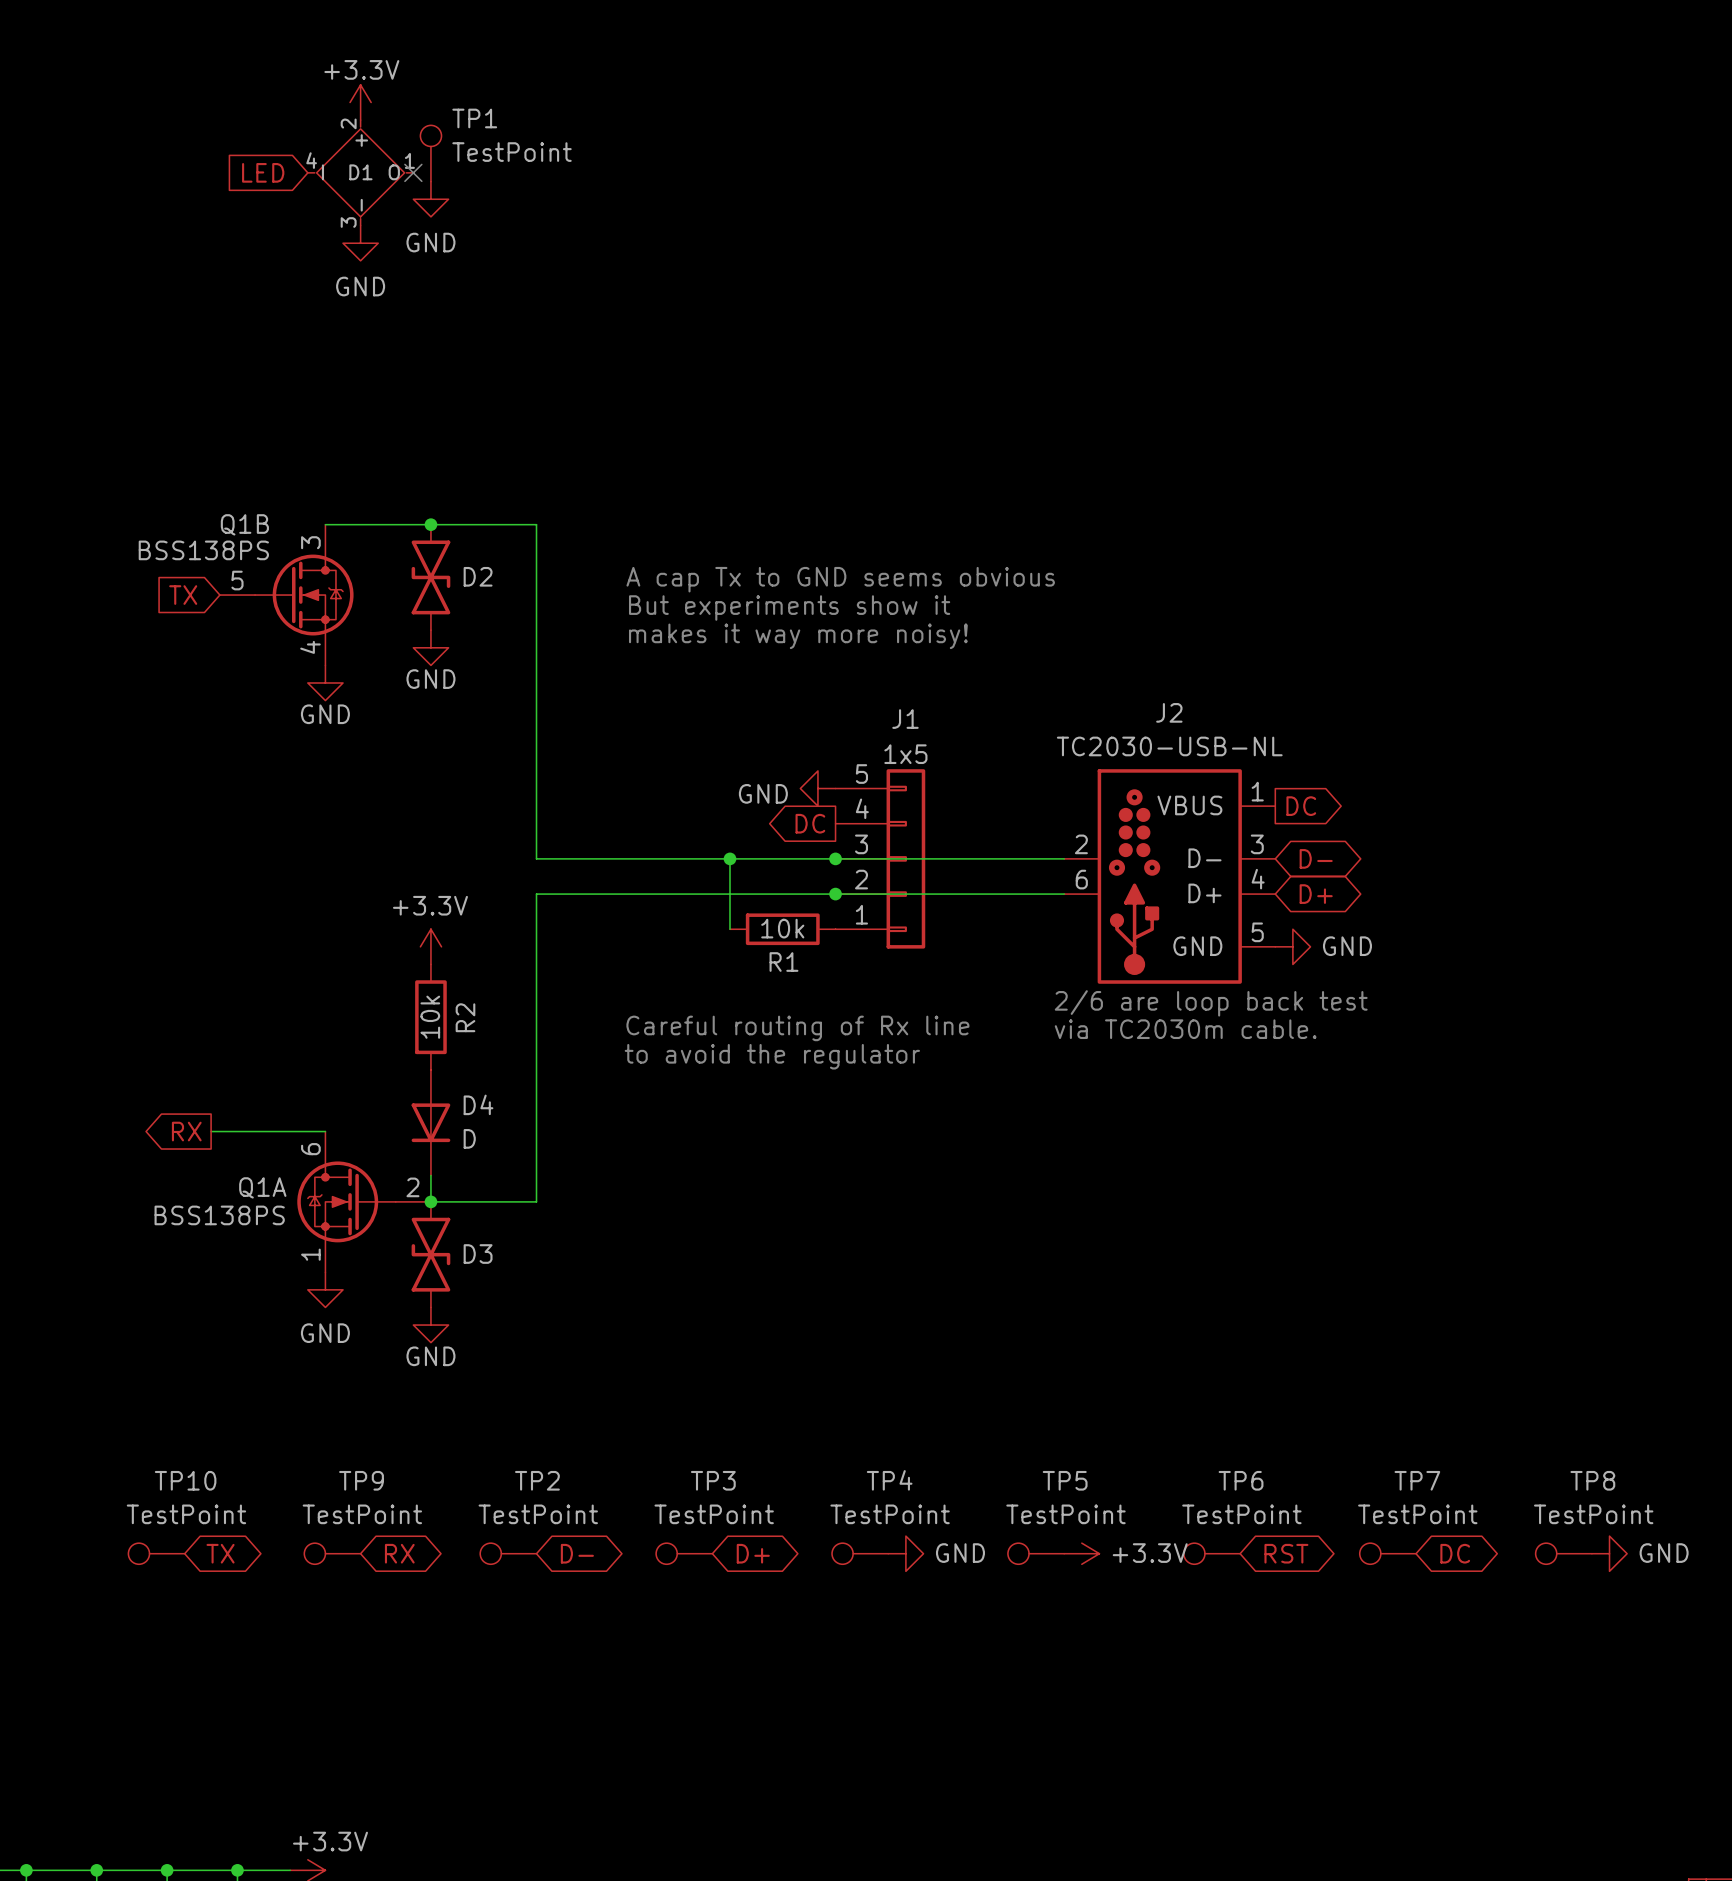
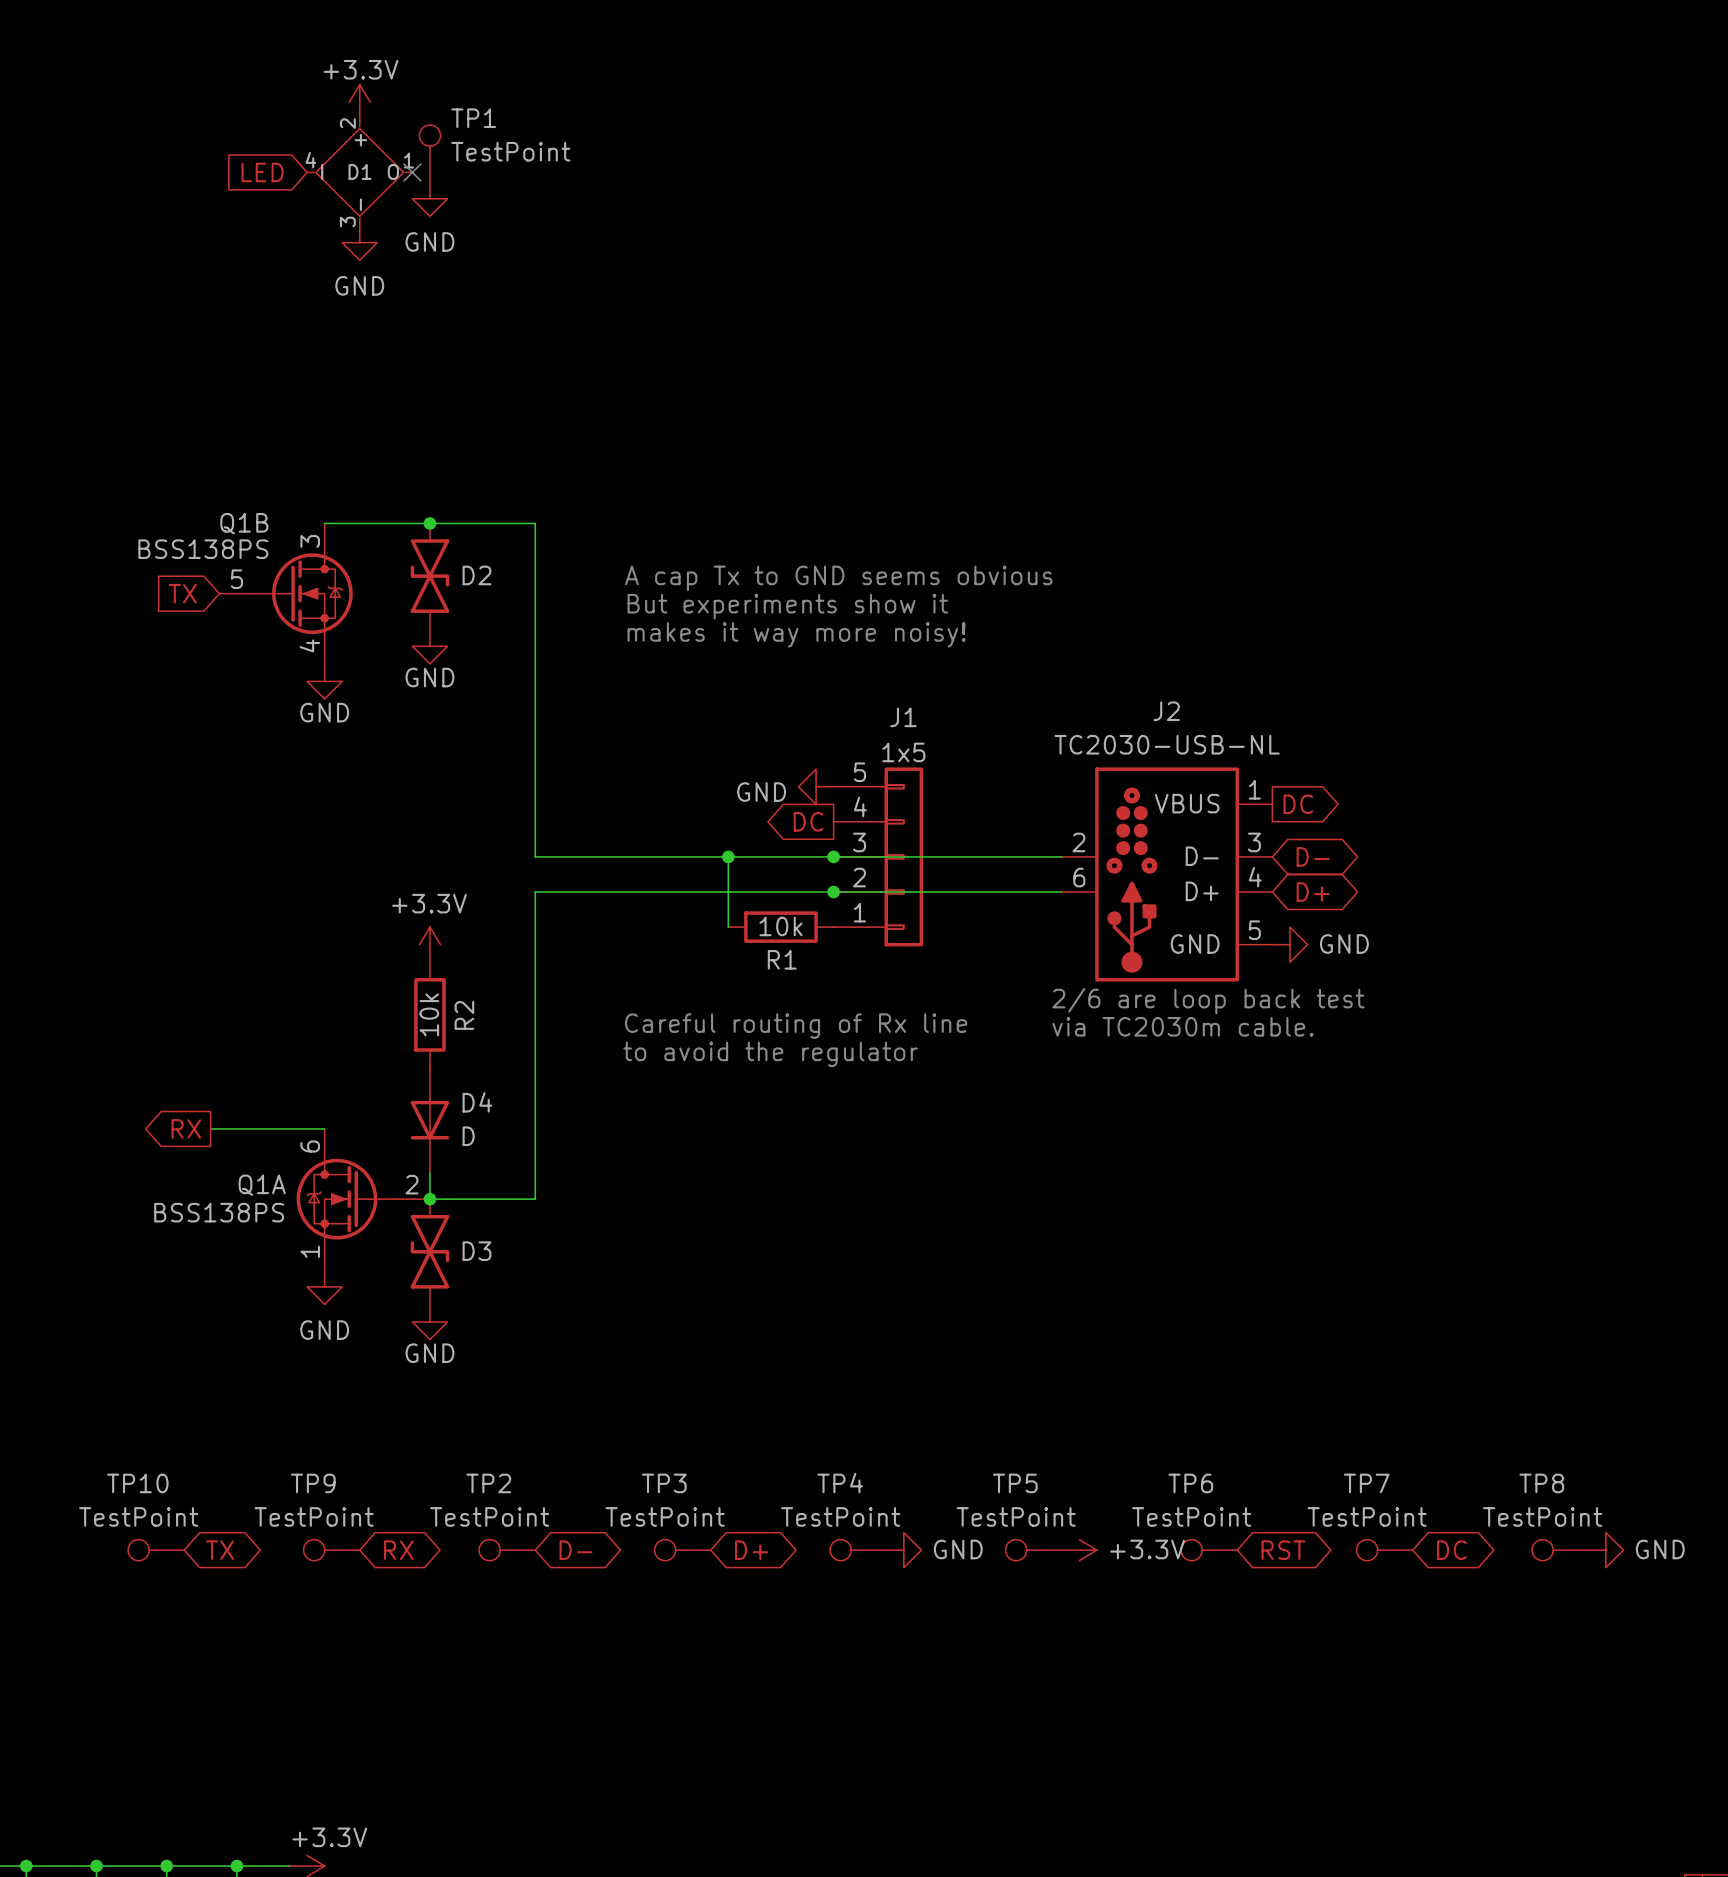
TP10 name position: TP10 (185, 1480) -> TP10 (137, 1483)
TP9 name position: TP9 (361, 1480) -> TP9 (313, 1483)
TP2 name position: TP2 (537, 1480) -> TP2 (488, 1483)
TP3 name position: TP3 (713, 1480) -> TP3 (664, 1483)
TP4 name position: TP4 (889, 1480) -> TP4 (840, 1483)
TP5 name position: TP5 (1065, 1480) -> TP5 (1015, 1483)
TP6 name position: TP6 (1241, 1480) -> TP6 (1190, 1483)
TP7 name position: TP7 (1417, 1480) -> TP7 (1366, 1483)
TP8 name position: TP8 (1592, 1480) -> TP8 (1541, 1483)
TP10 value position: TestPoint (186, 1514) -> TestPoint (138, 1516)
TP9 value position: TestPoint (362, 1514) -> TestPoint (314, 1516)
TP2 value position: TestPoint (538, 1514) -> TestPoint (489, 1516)
TP3 value position: TestPoint (714, 1514) -> TestPoint (665, 1516)
TP4 value position: TestPoint (890, 1514) -> TestPoint (840, 1516)
TP5 value position: TestPoint (1065, 1514) -> TestPoint (1016, 1516)
TP6 value position: TestPoint (1241, 1514) -> TestPoint (1191, 1516)
TP7 value position: TestPoint (1417, 1514) -> TestPoint (1367, 1516)
TP8 value position: TestPoint (1593, 1514) -> TestPoint (1542, 1516)

